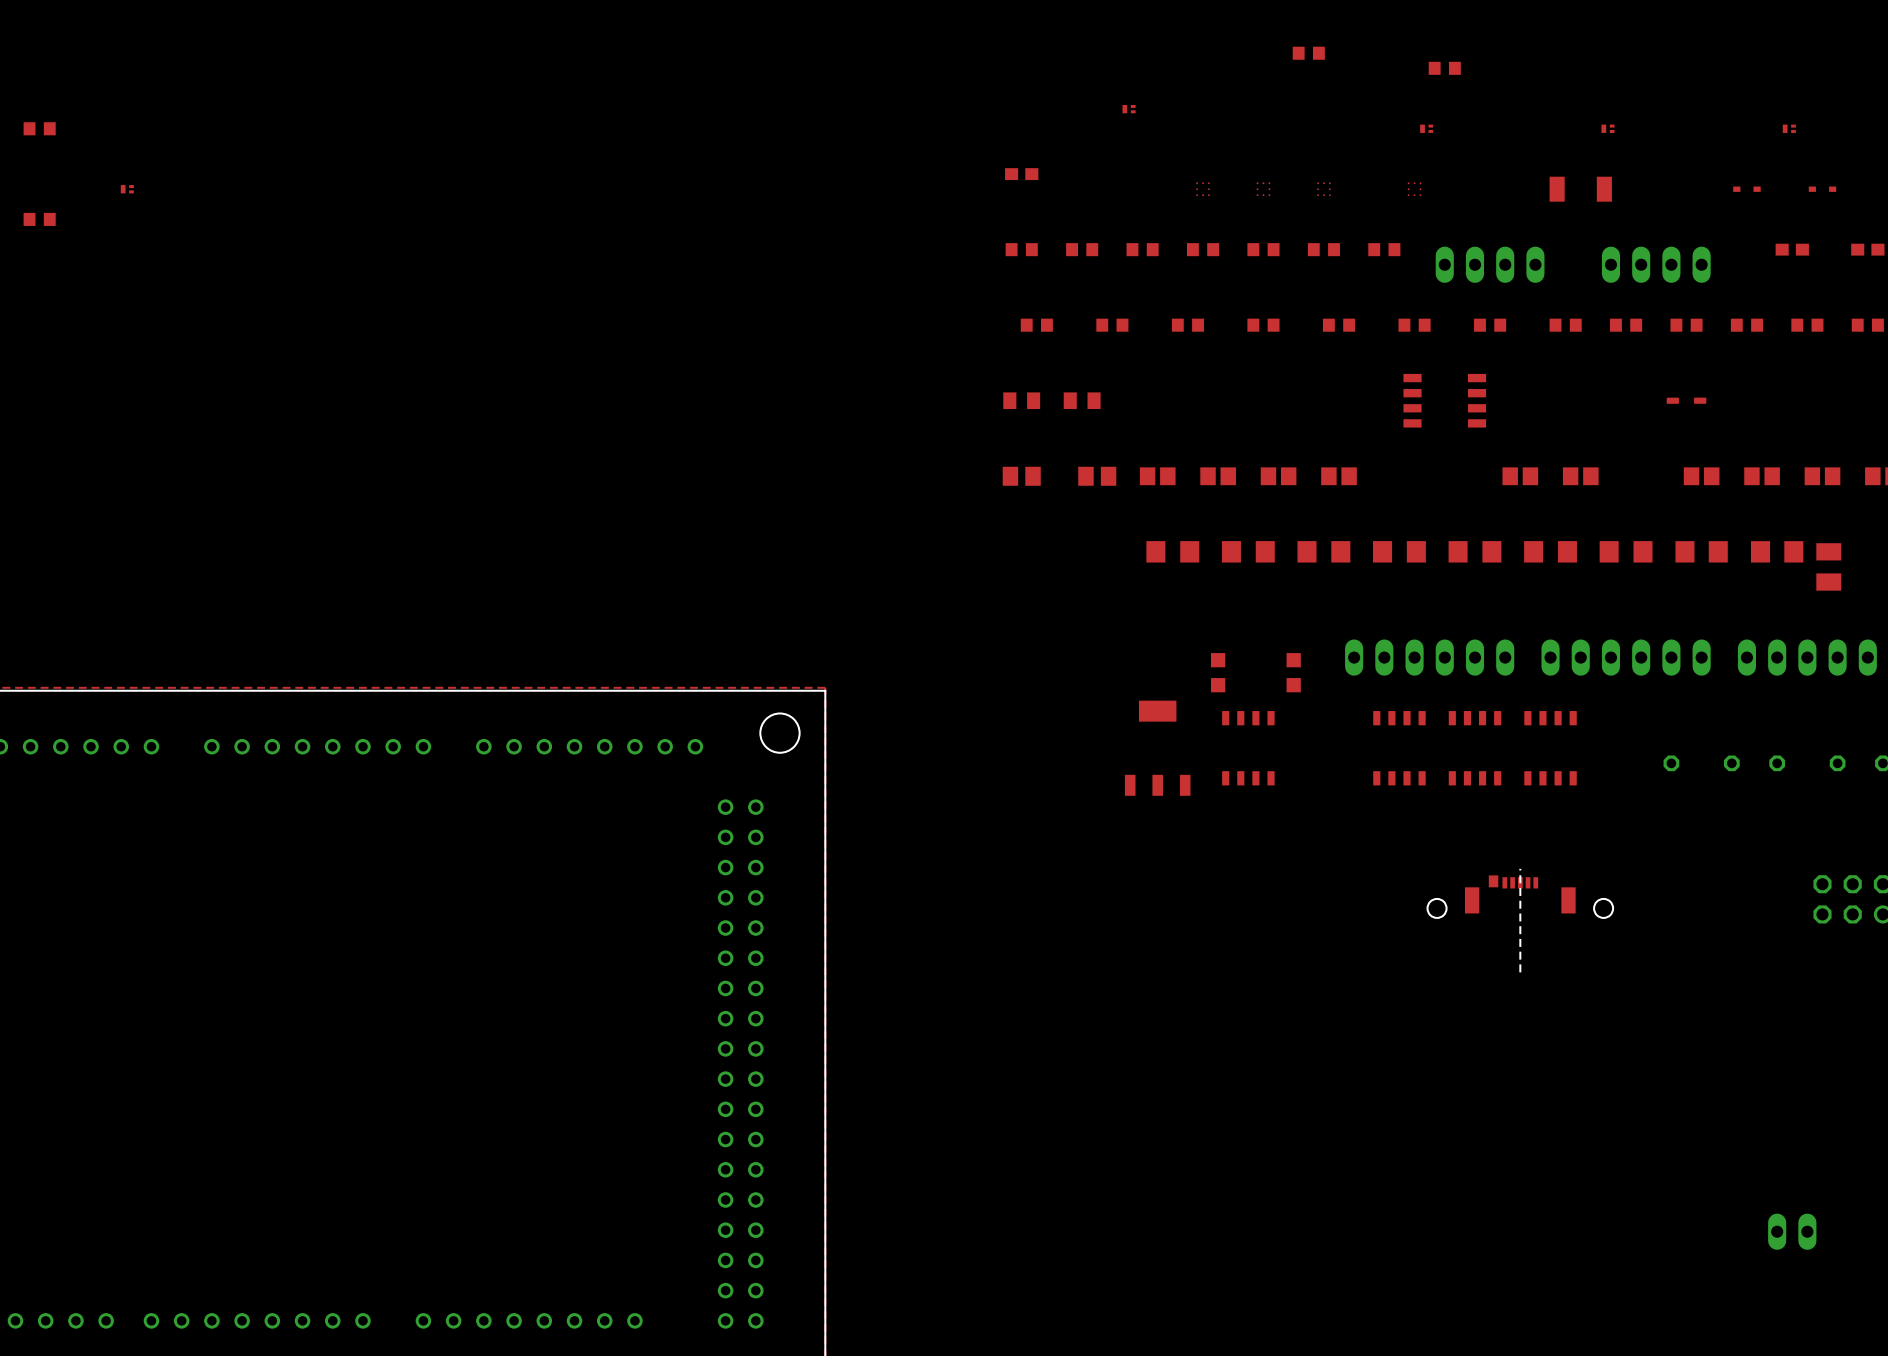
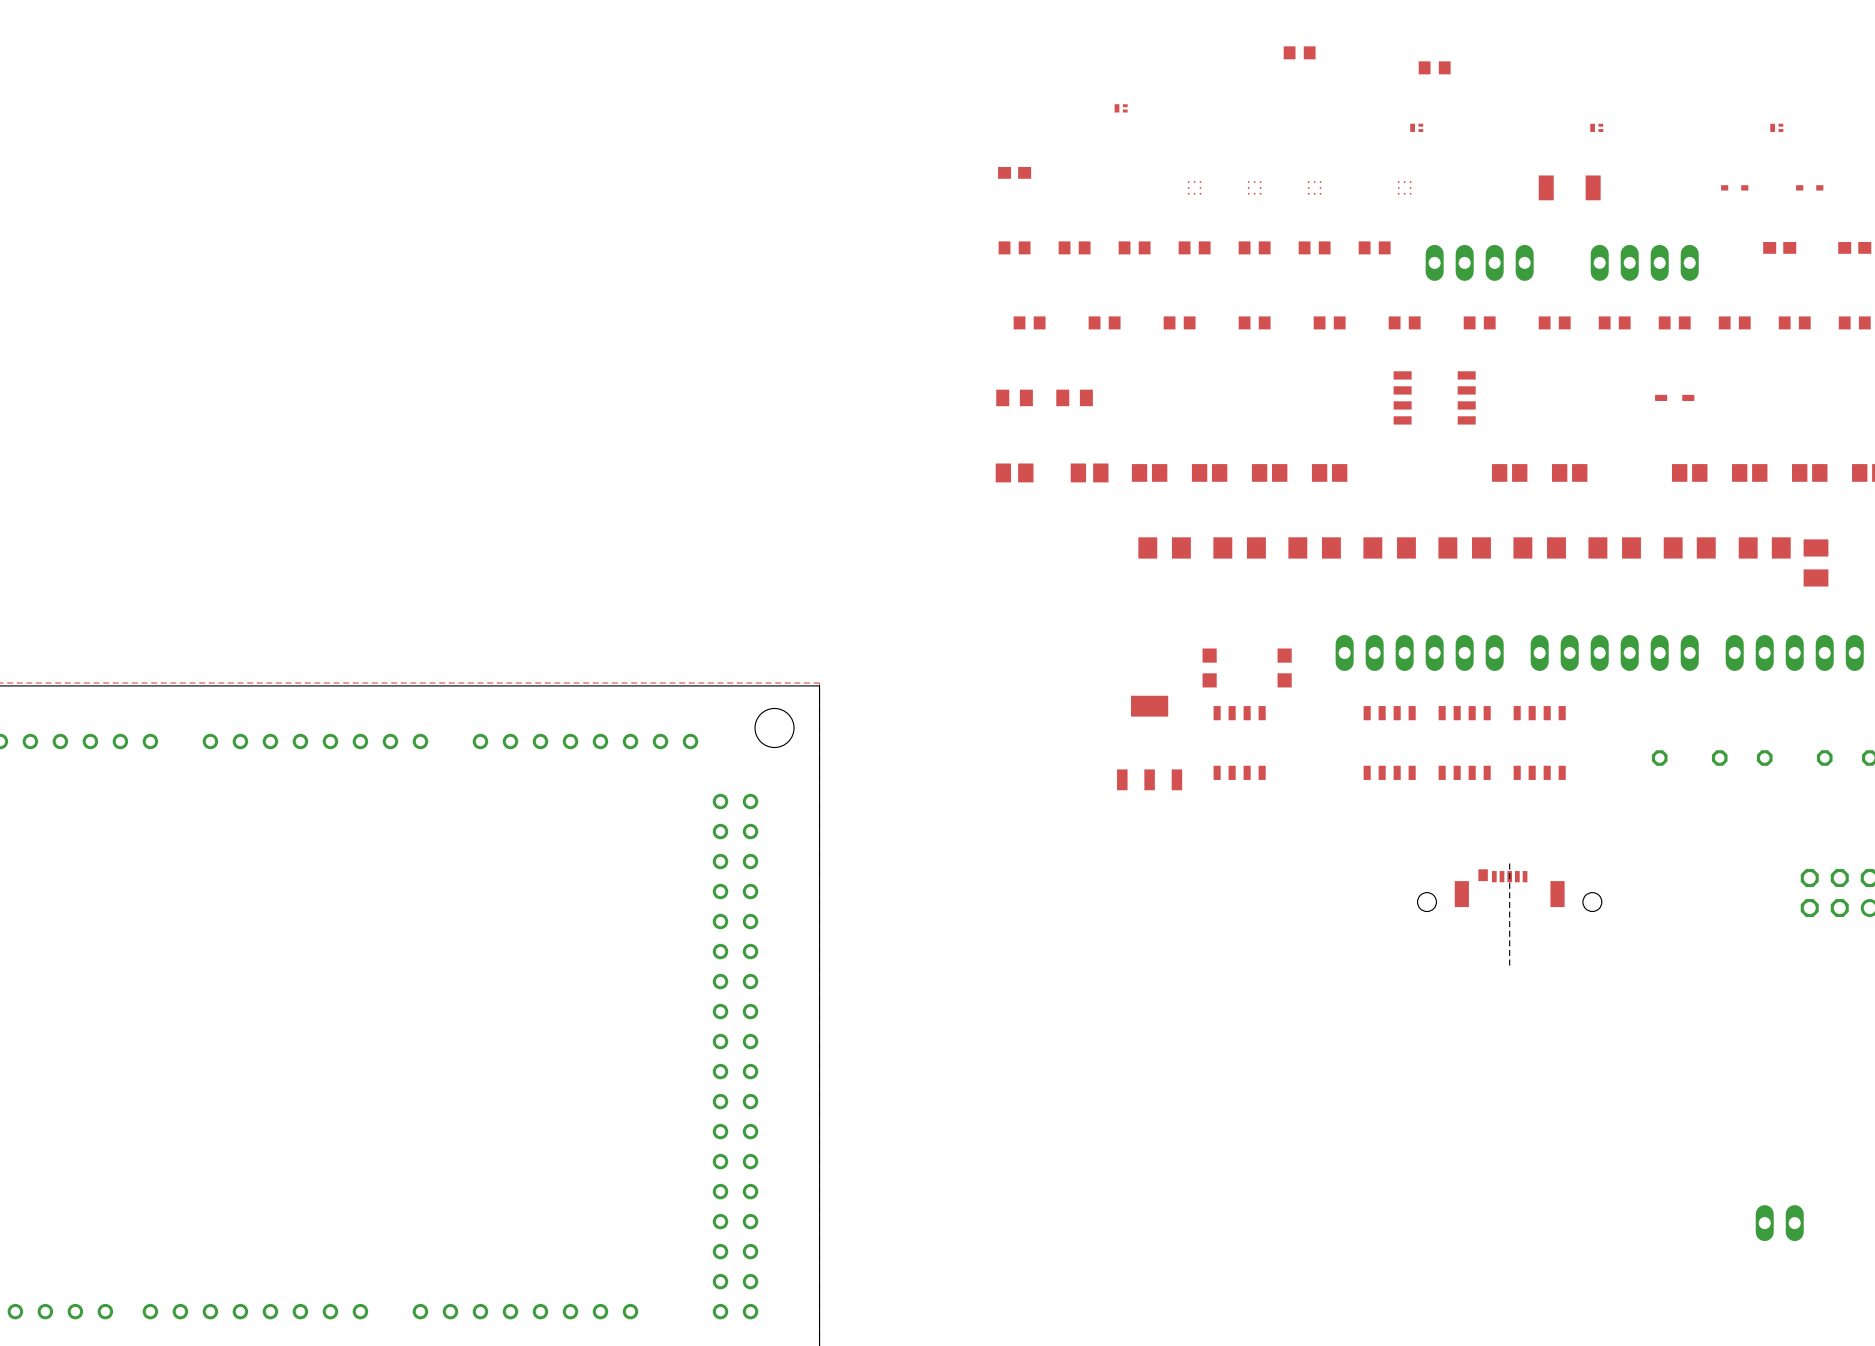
part: (39, 128) -> none
part: (127, 189) -> none
part: (39, 219) -> none

